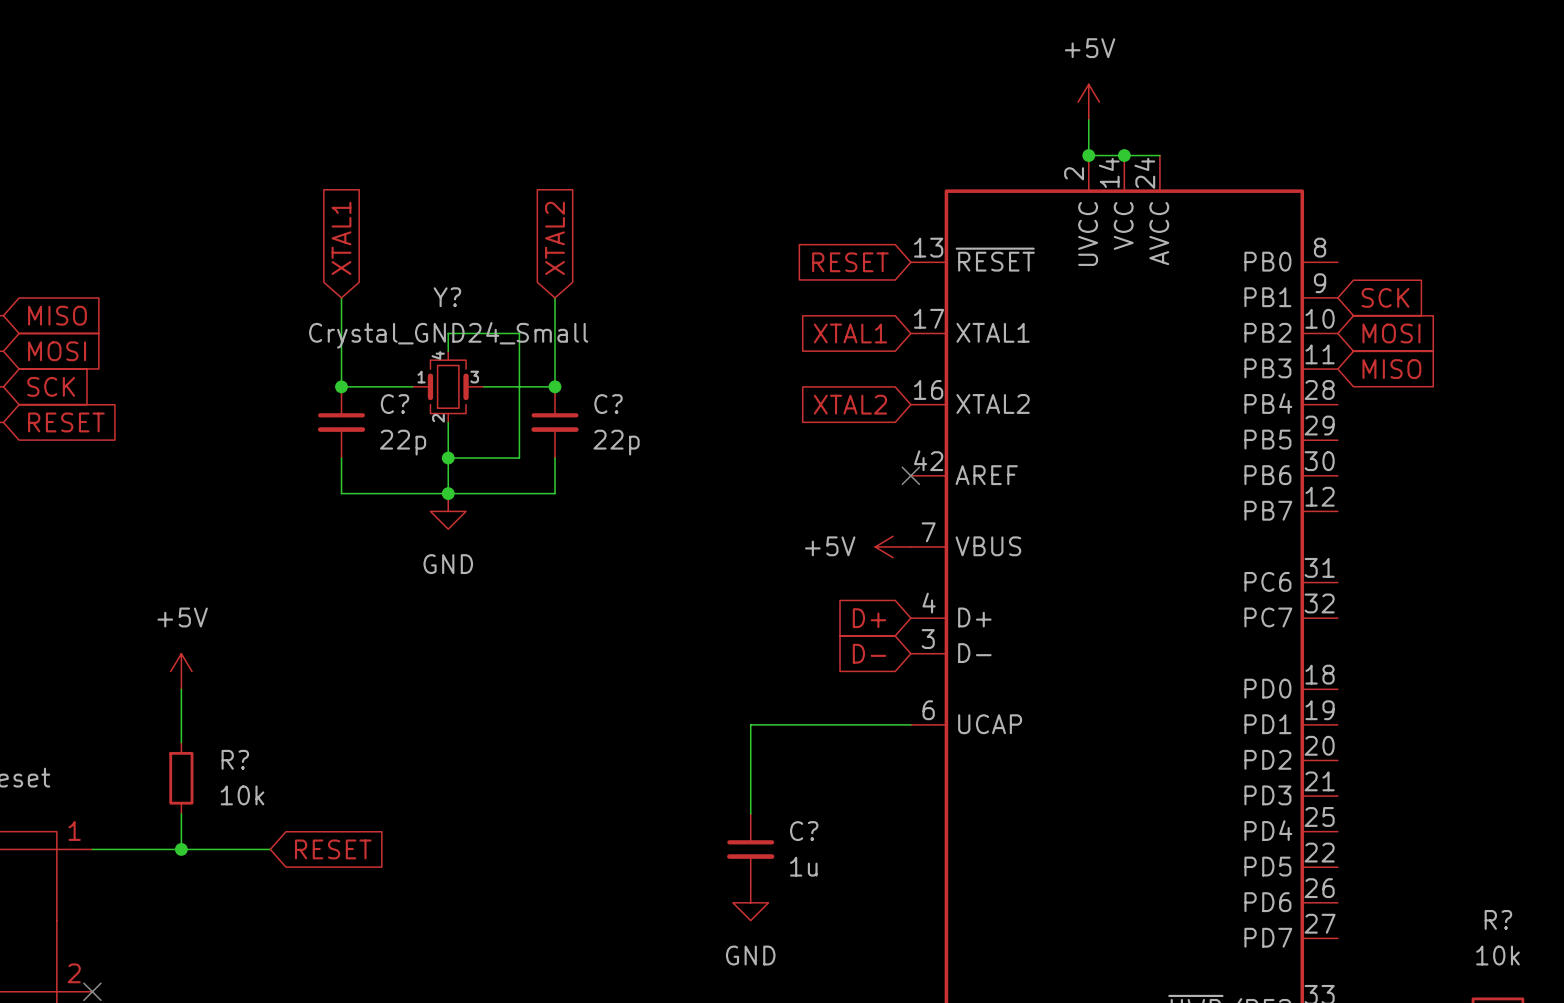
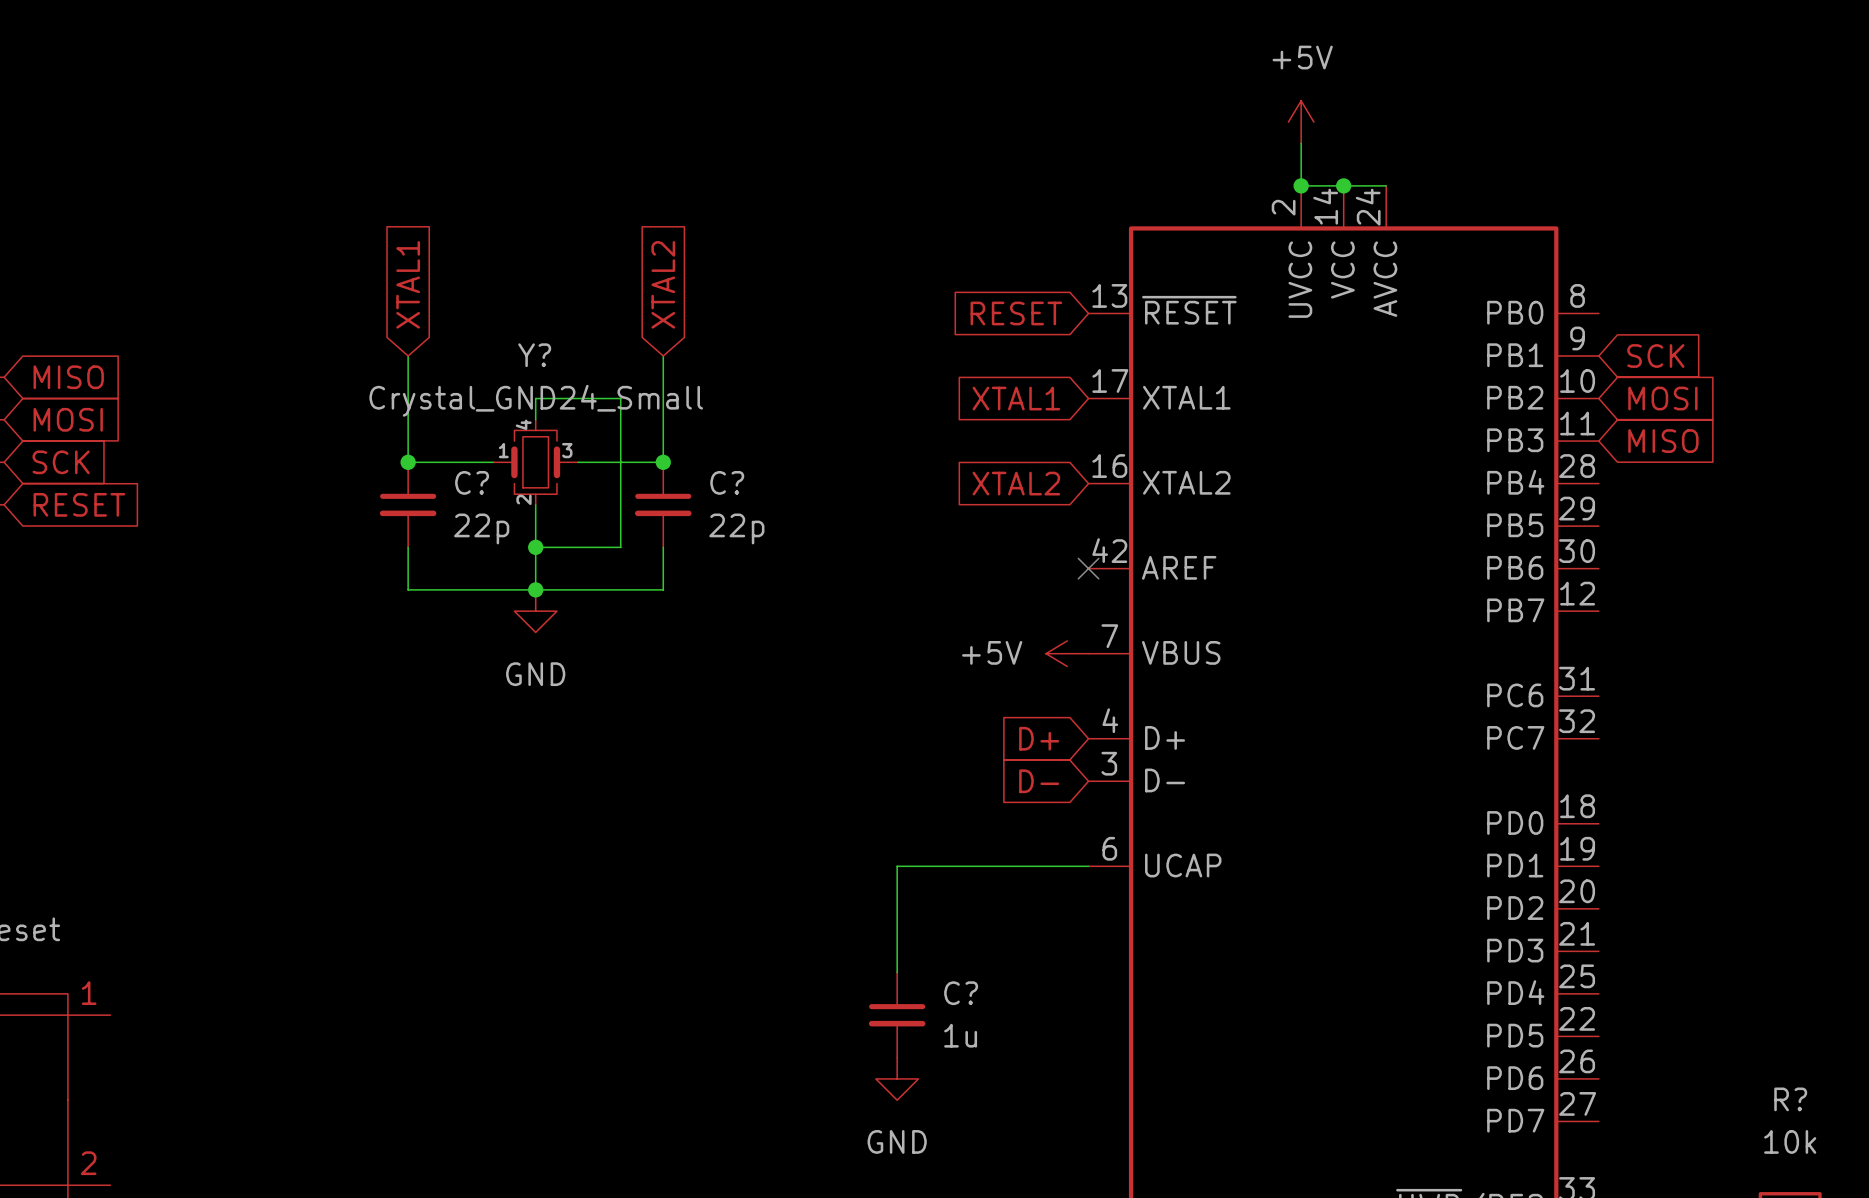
power symbol: +5V (181, 671) -> none
wire: (181, 689) (181, 742) -> none
R?: 10k (181, 778) -> none
wire: (181, 813) (181, 849) -> none
wire: (92, 849) (270, 849) -> none
junction: (181, 849) -> none
global label: RESET (333, 849) -> none
no-connect mark: (92, 991) -> none

